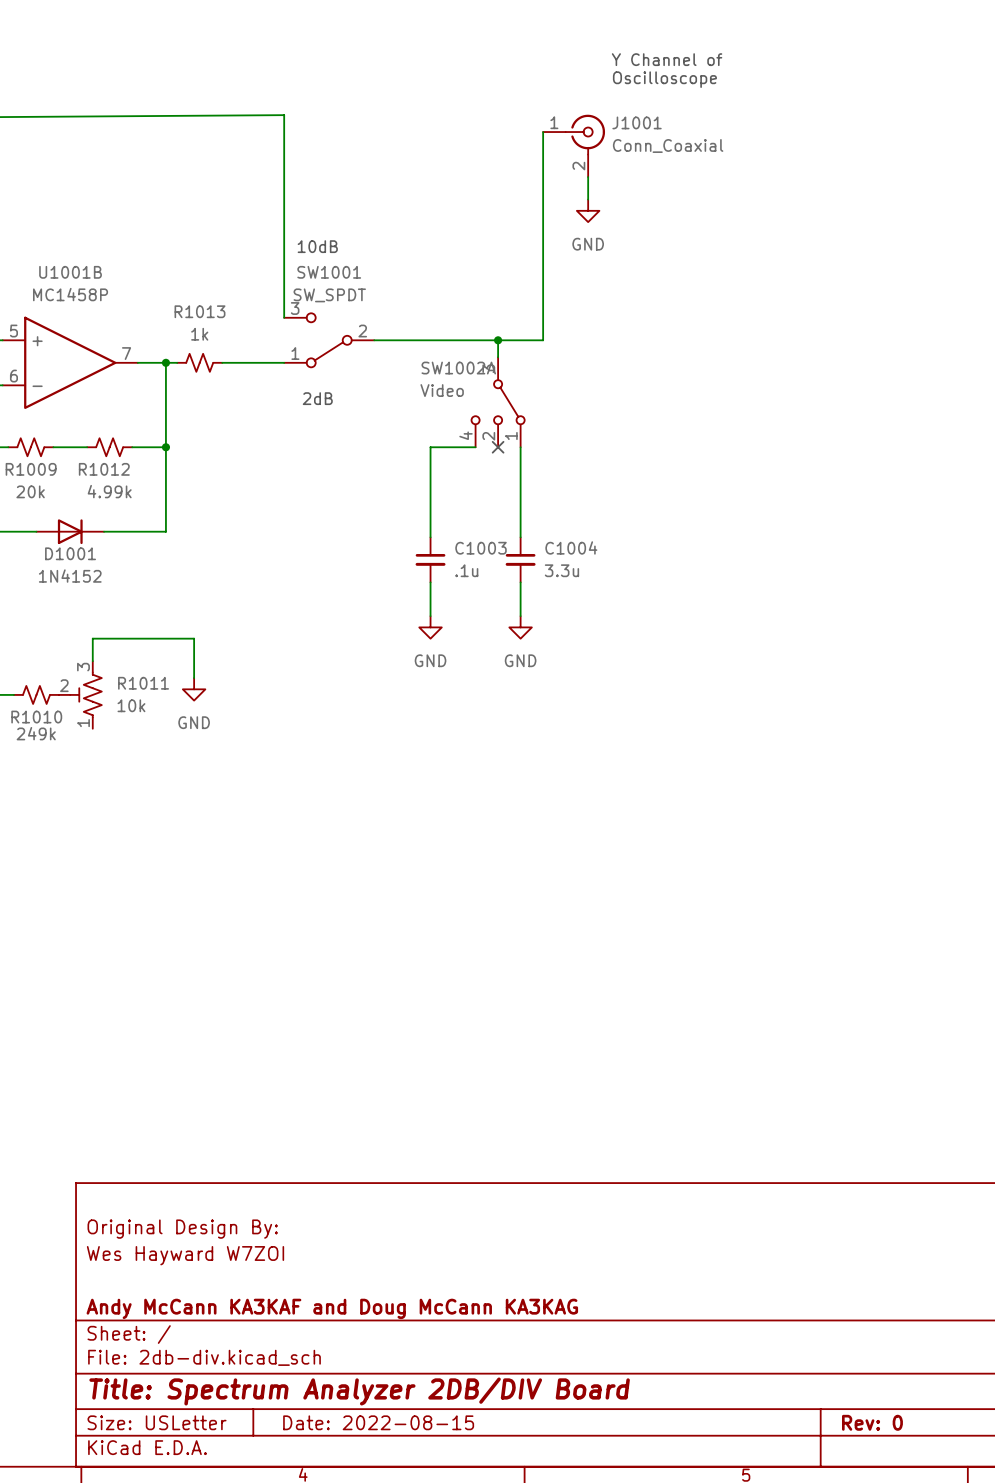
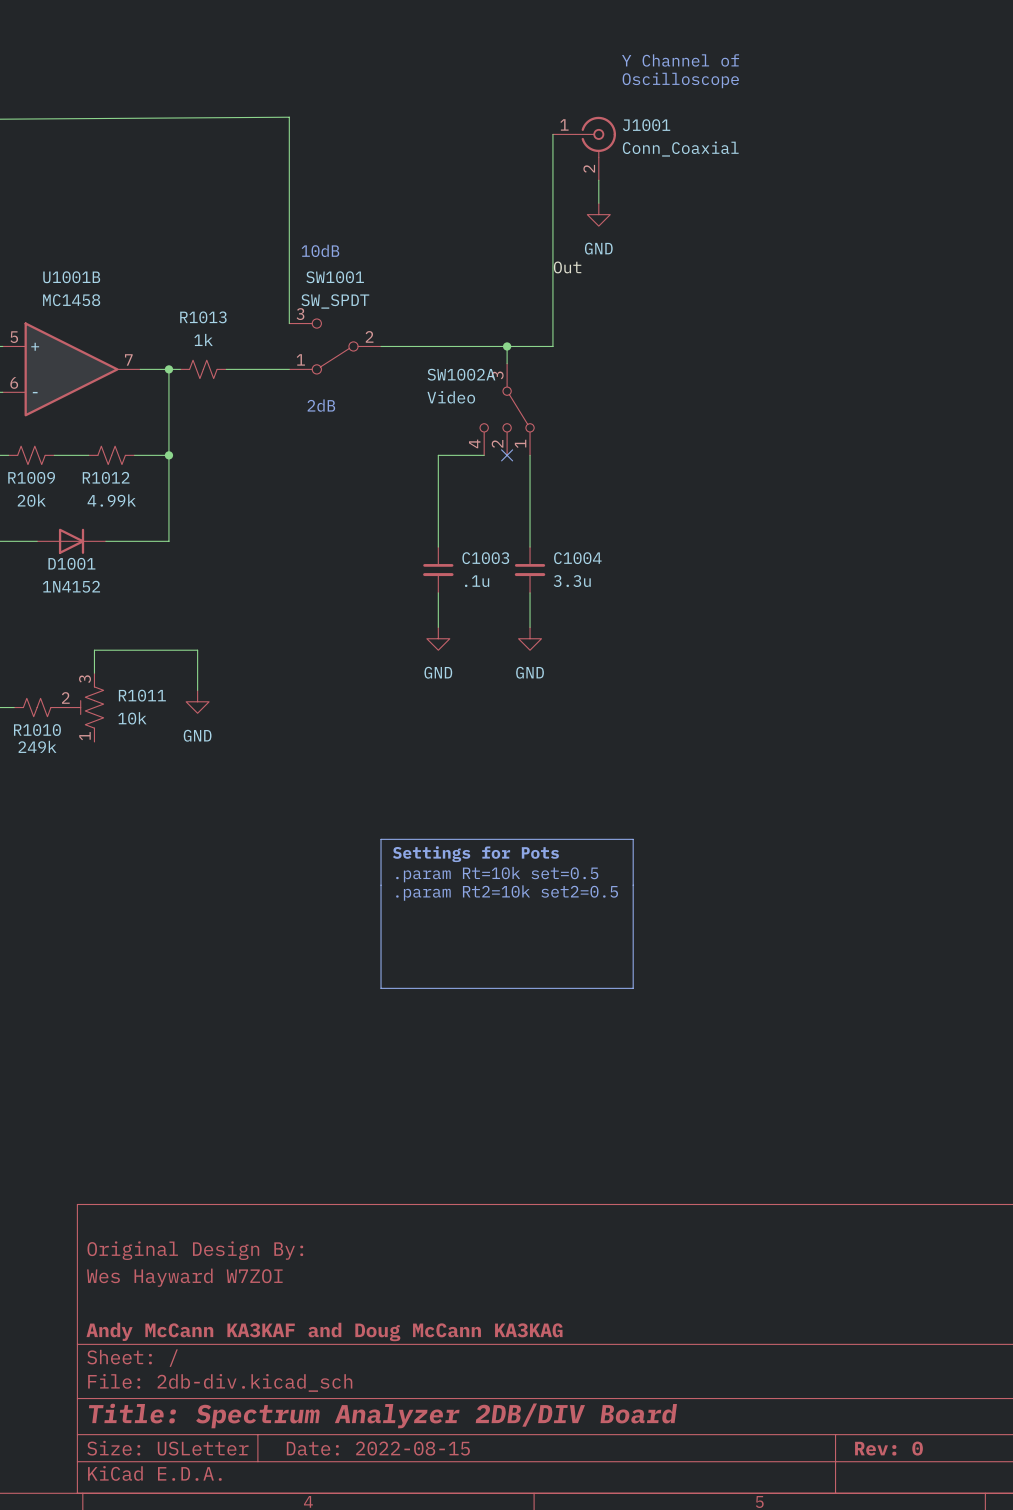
label: none -> Out (567, 267)
U1001B value: MC1458P (70, 294) -> MC1458 (71, 300)
line: none -> (381, 839) (381, 988) (633, 988) (633, 839) (381, 839)
text: none -> Settings for Pots (475, 854)
text: none -> .param Rt=10k set=0.5 (497, 874)
text: none -> .param Rt2=10k set2=0.5 (507, 893)

